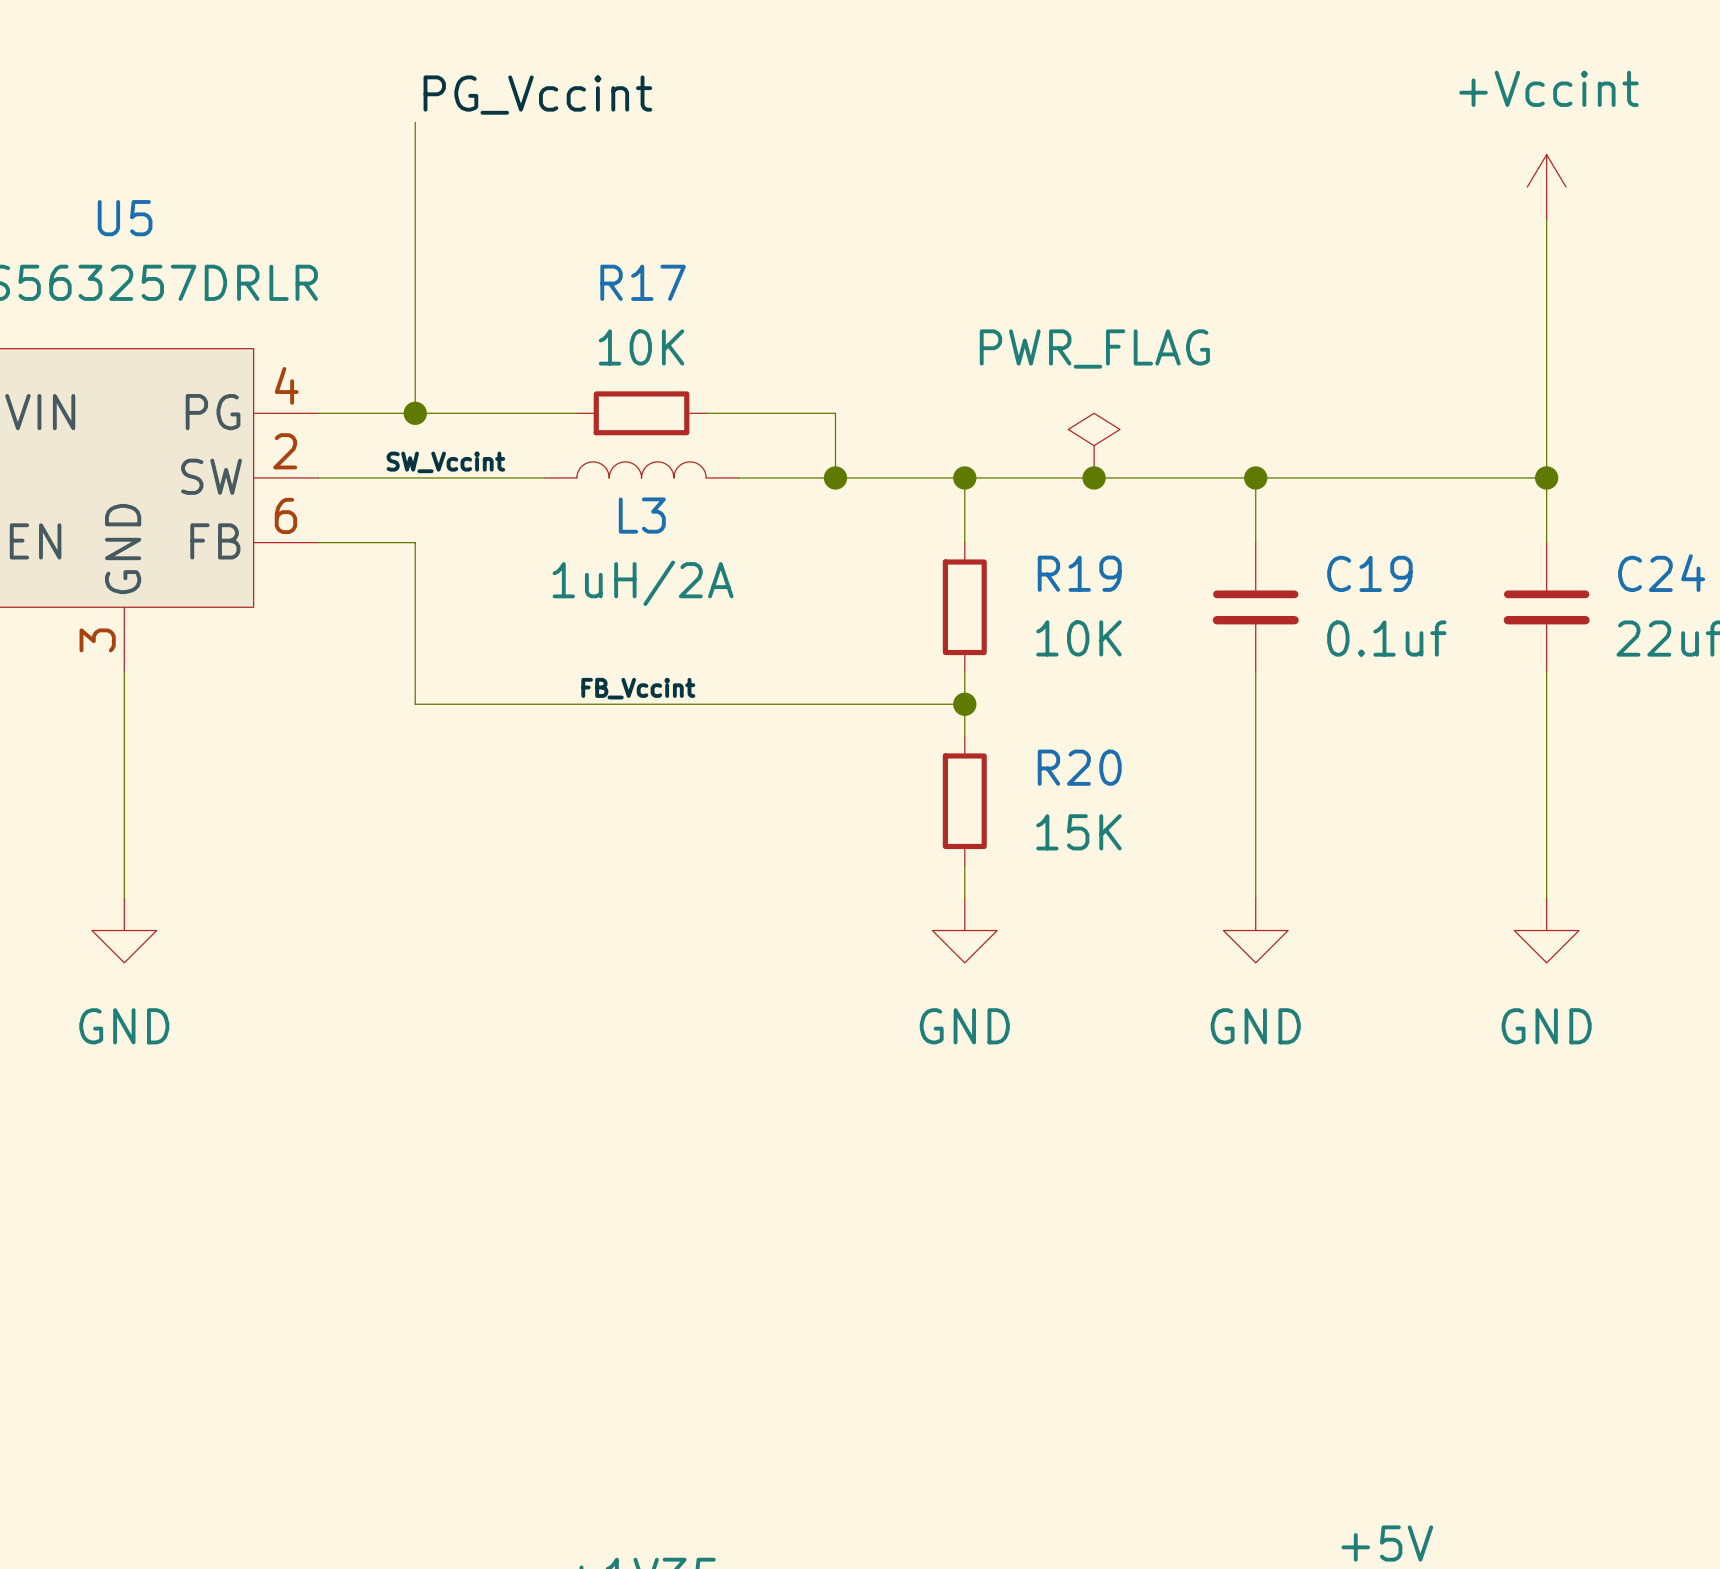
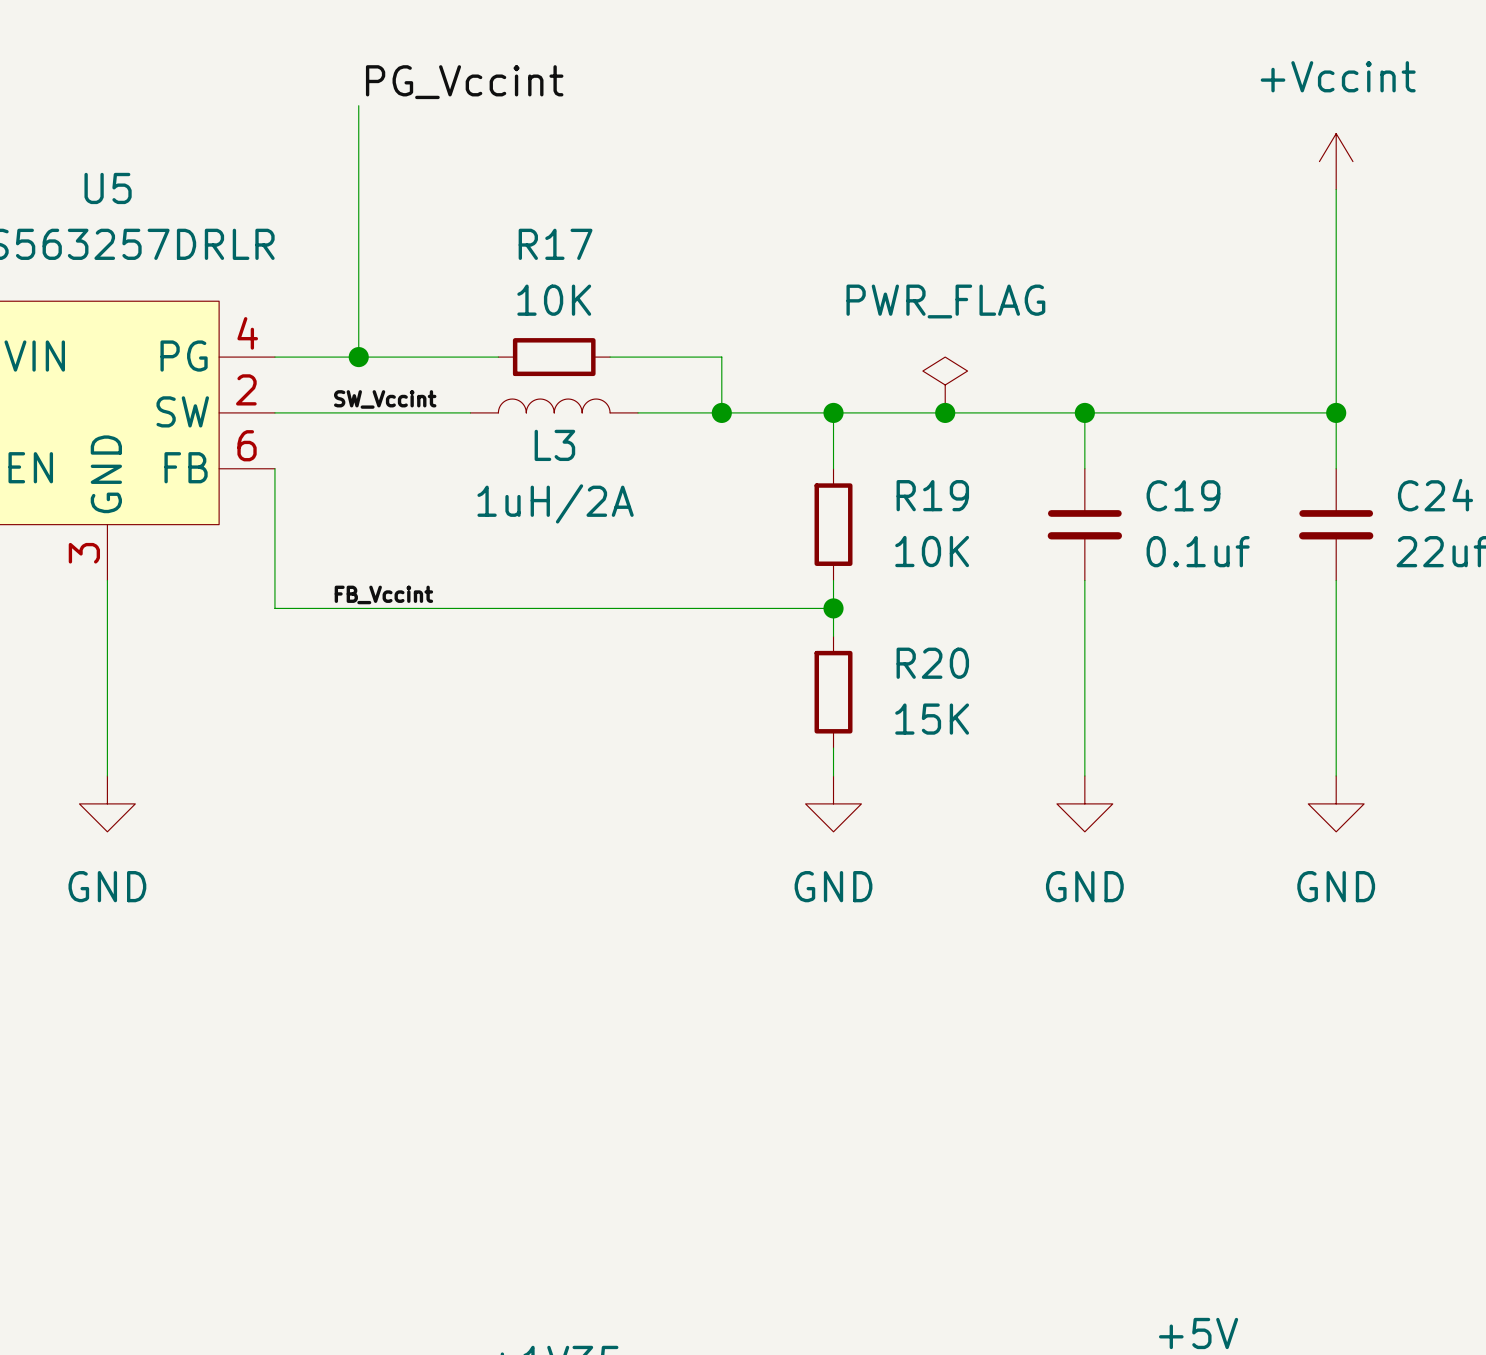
wire: (318, 542) (415, 542) (415, 704) -> (274, 468) (274, 608) (358, 608)
label position: FB_Vccint (638, 688) -> FB_Vccint (383, 594)

